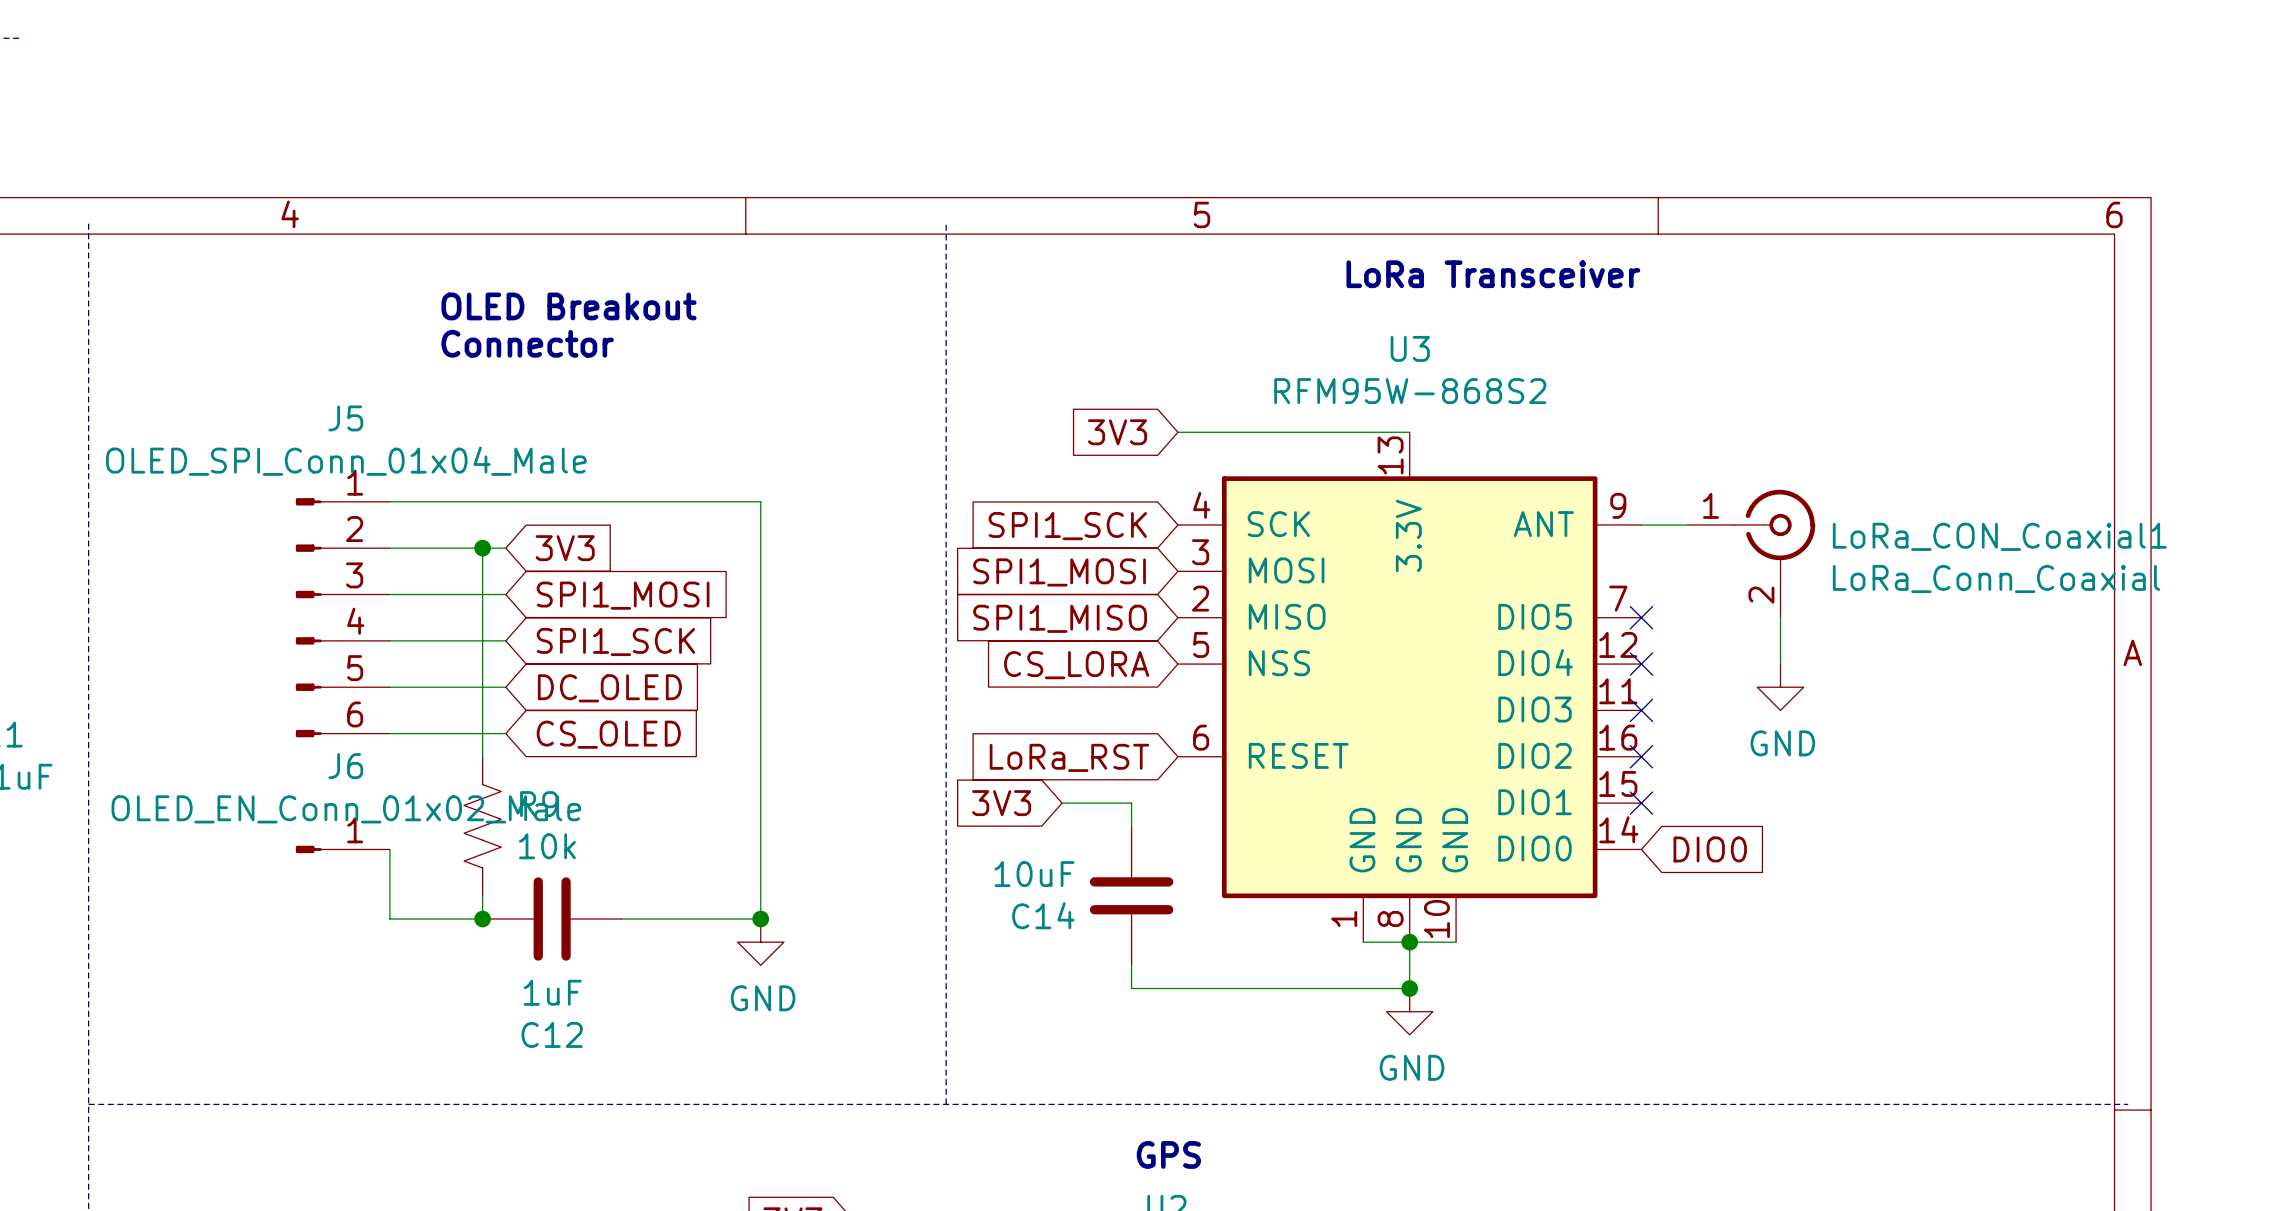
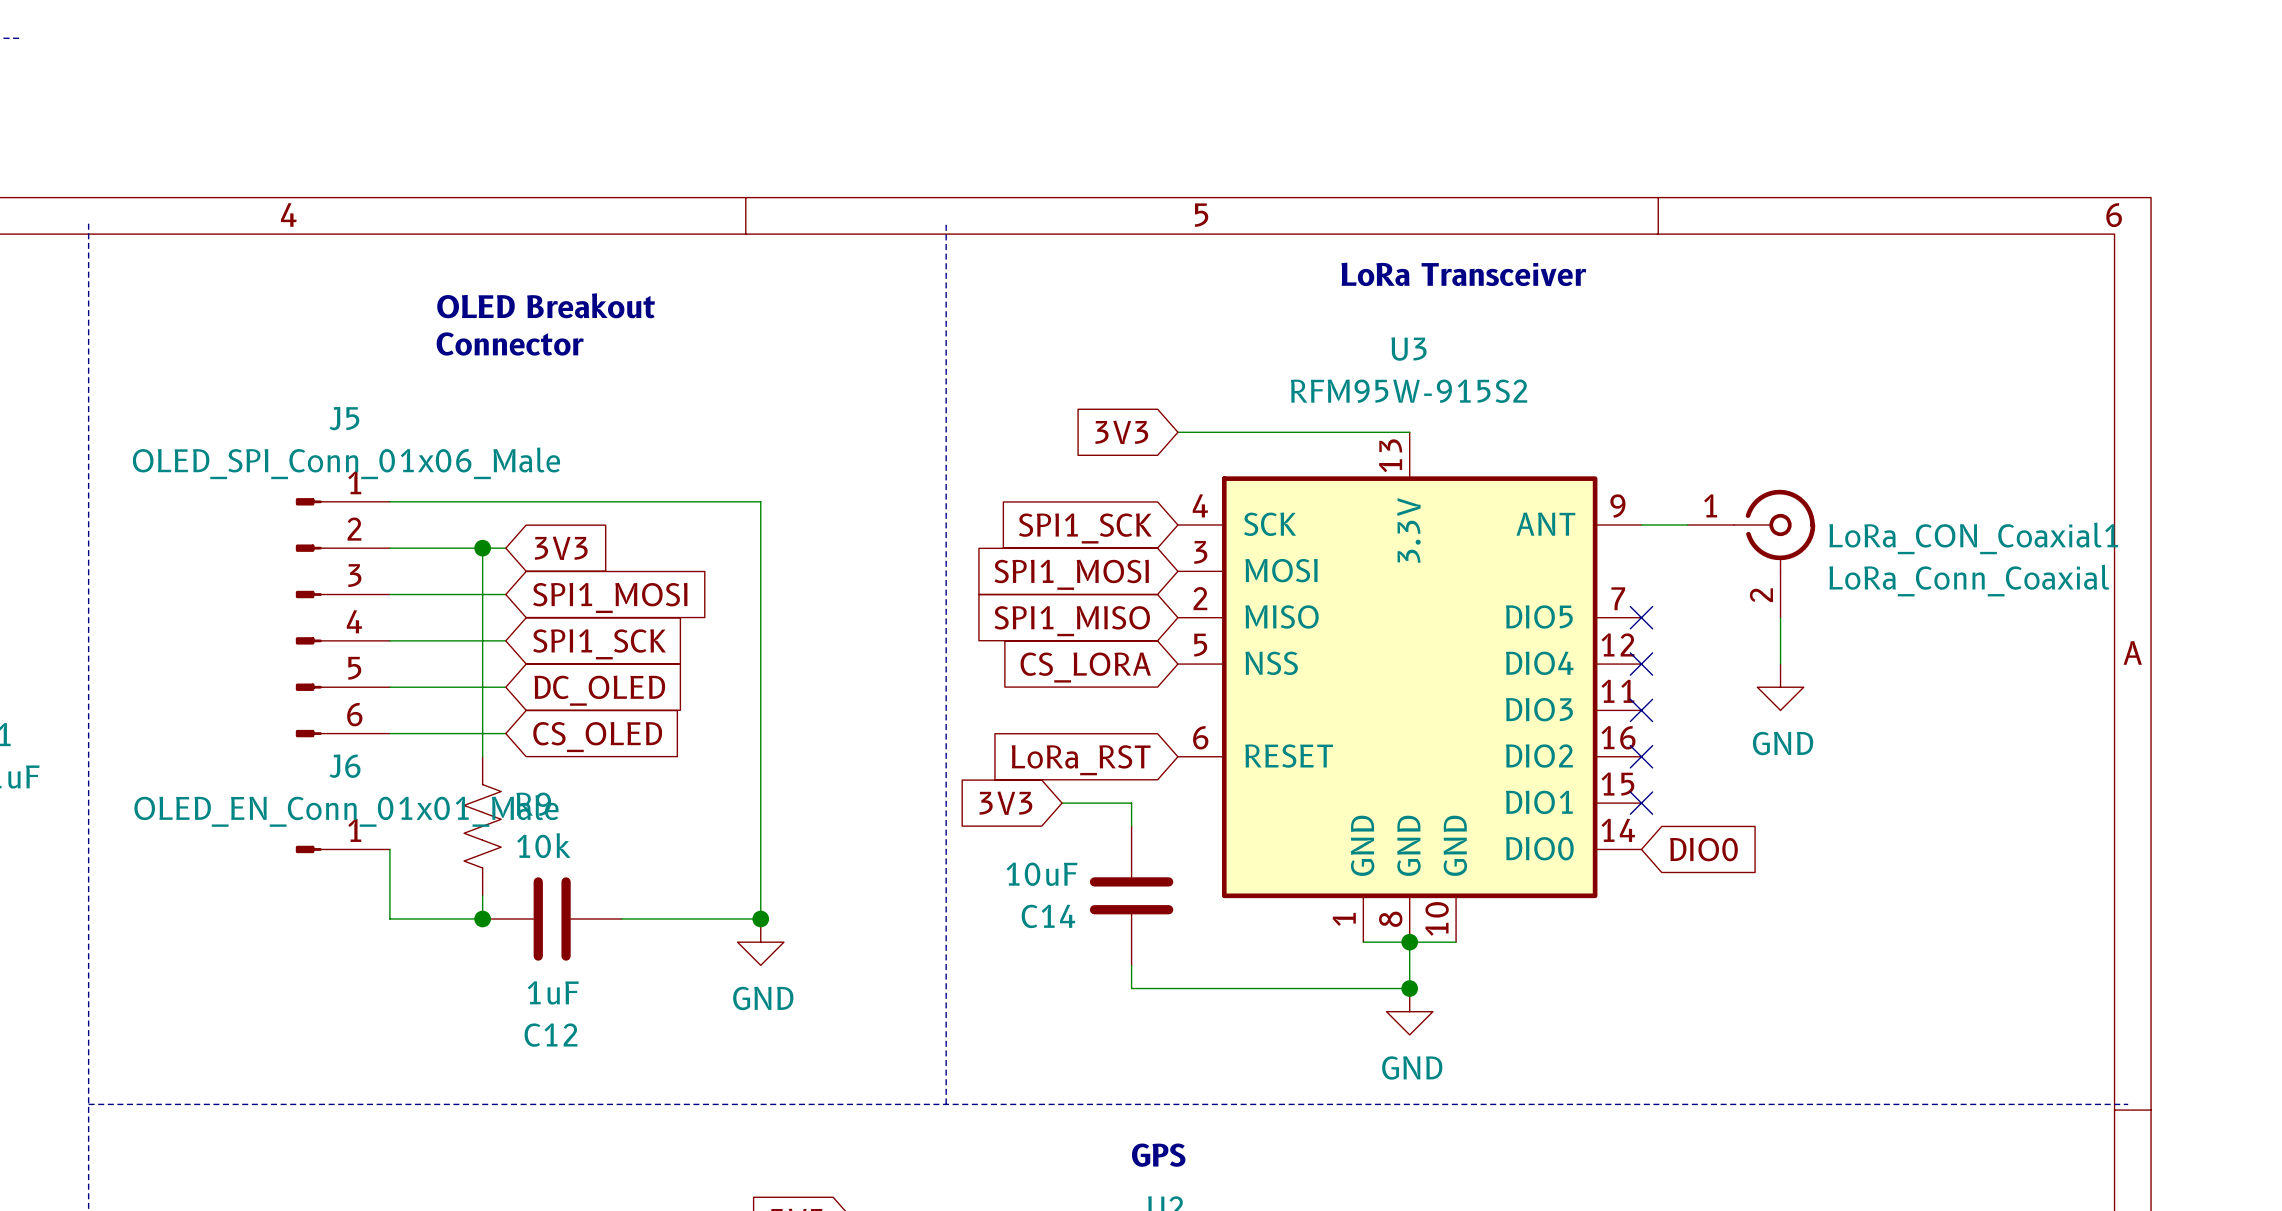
U3 value: RFM95W-868S2 (1410, 391) -> RFM95W-915S2 (1409, 391)
J5 value: OLED_SPI_Conn_01x04_Male (346, 461) -> OLED_SPI_Conn_01x06_Male (346, 463)
J6 value: OLED_EN_Conn_01x02_Male (346, 809) -> OLED_EN_Conn_01x01_Male (346, 810)

